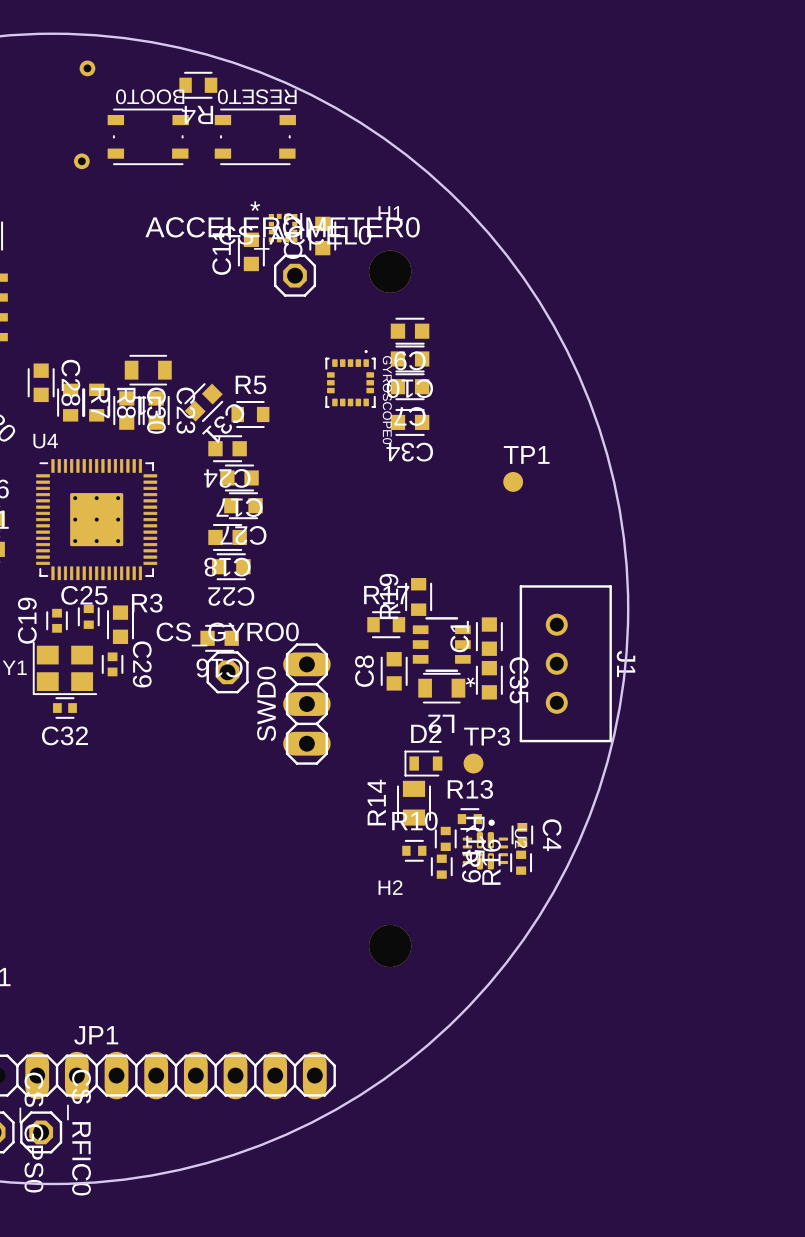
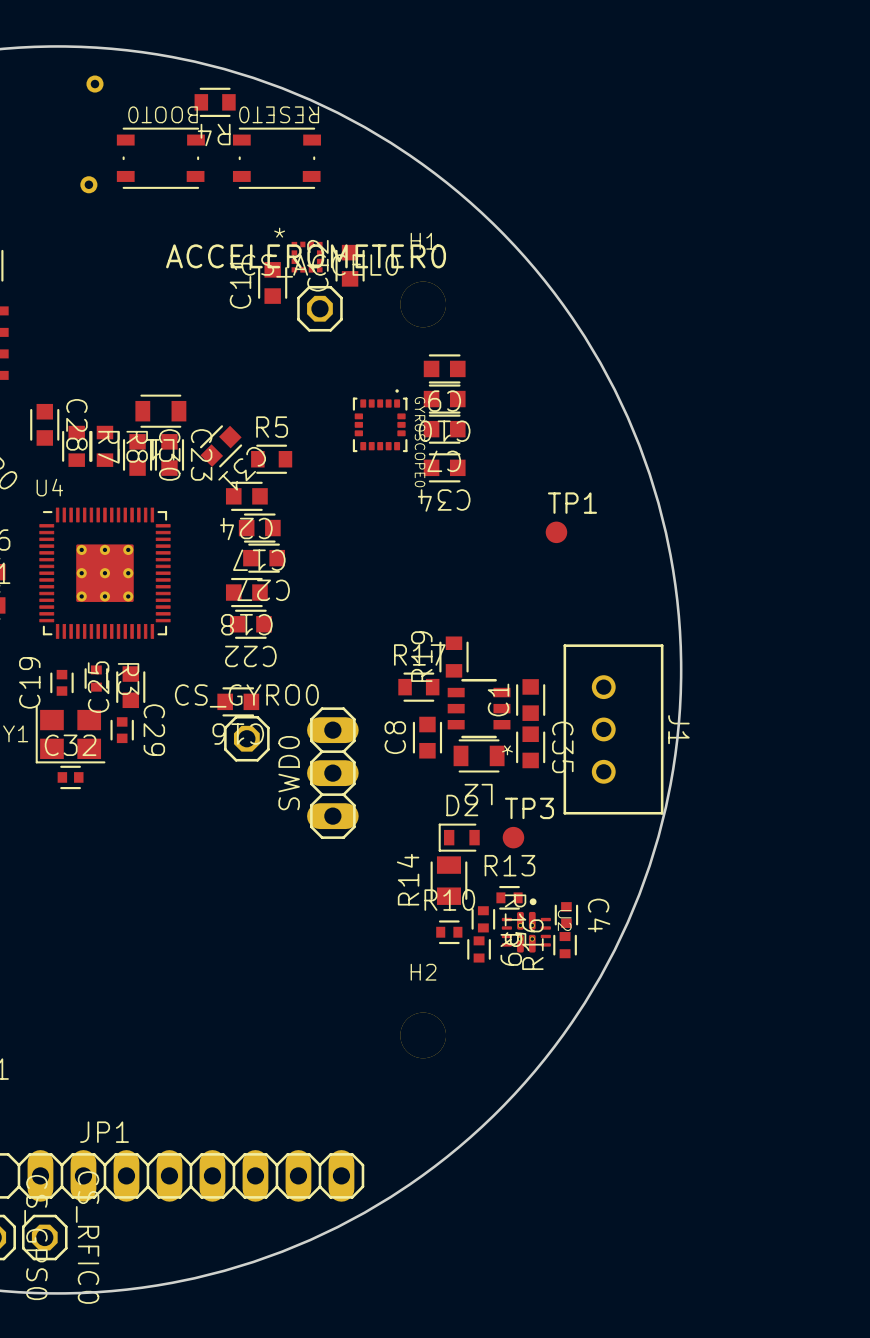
C25 name rotation: 0° (84, 595) -> 90° counterclockwise (98, 687)
R3 name rotation: 0° (147, 603) -> 90° clockwise (128, 679)
C32 name position: C32 (64, 735) -> C32 (70, 745)

